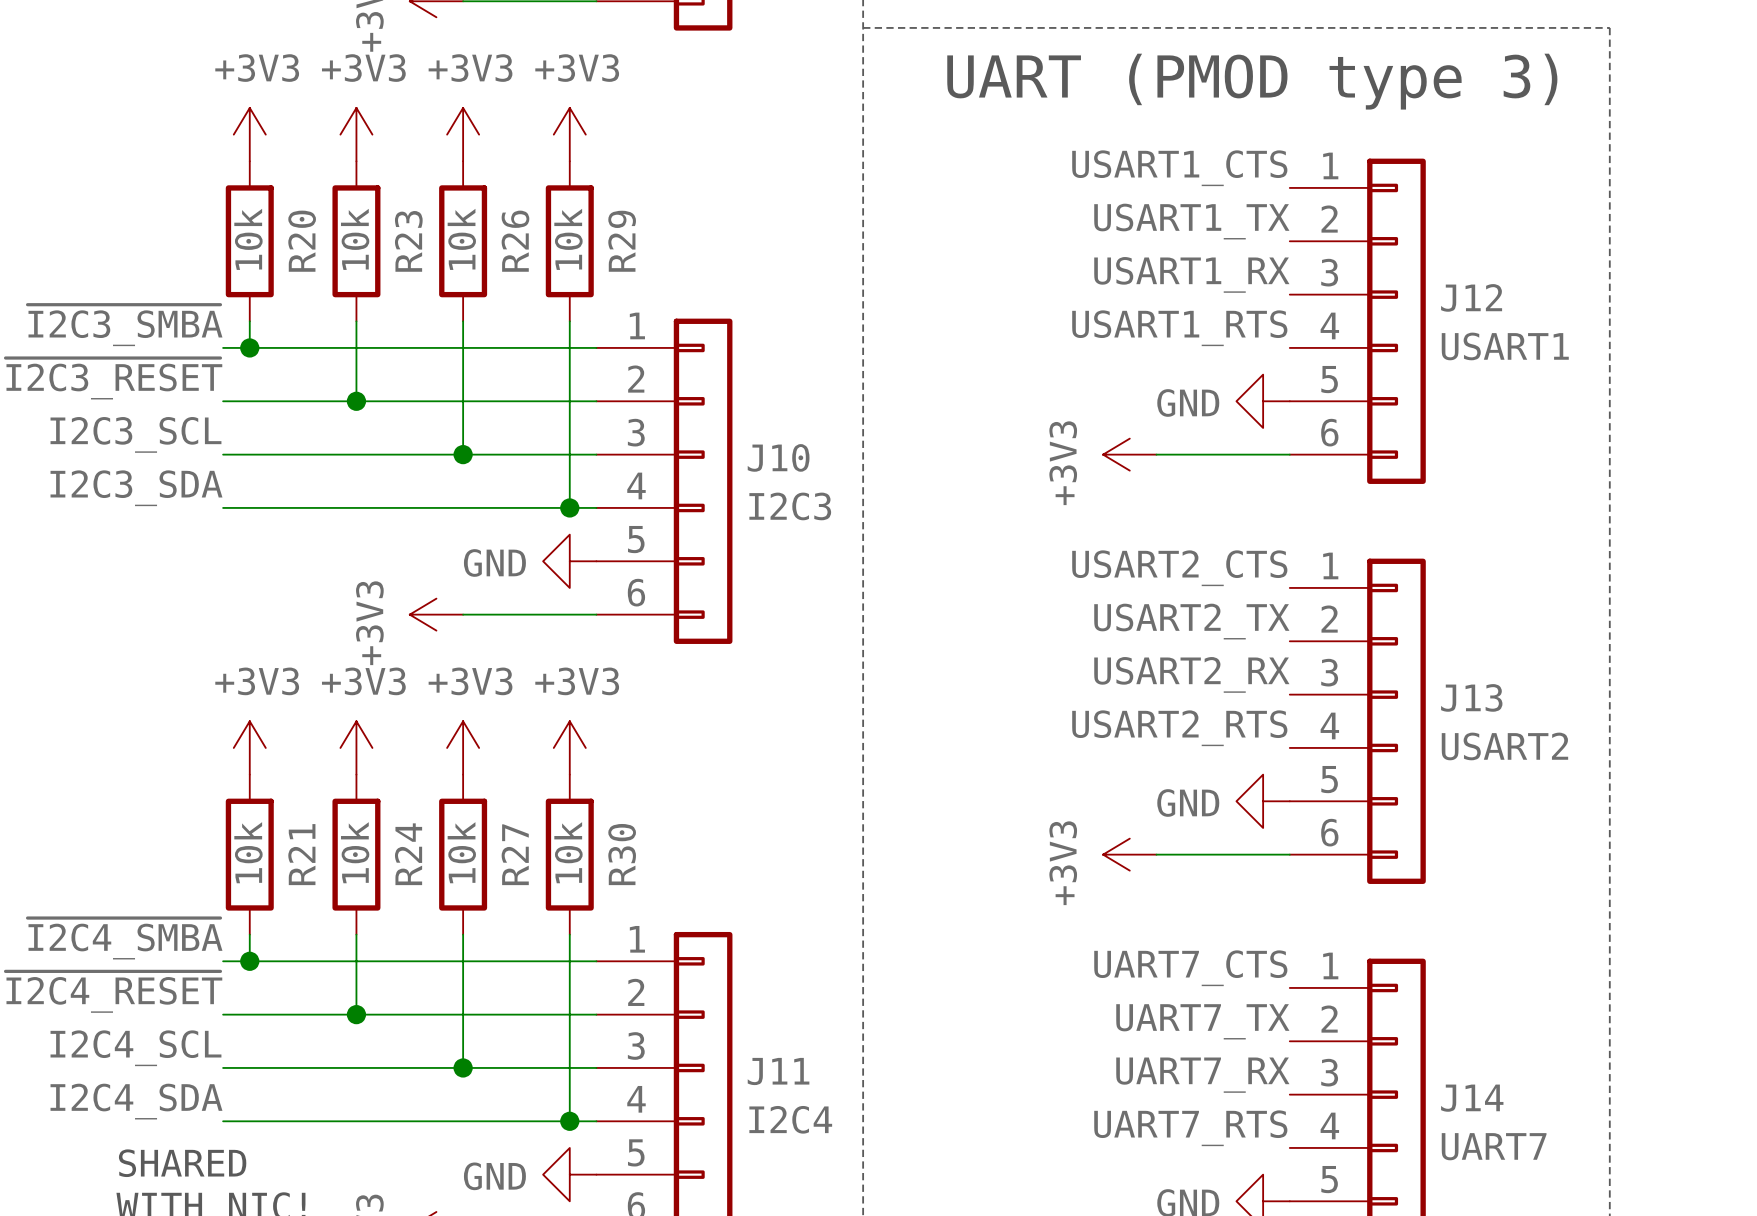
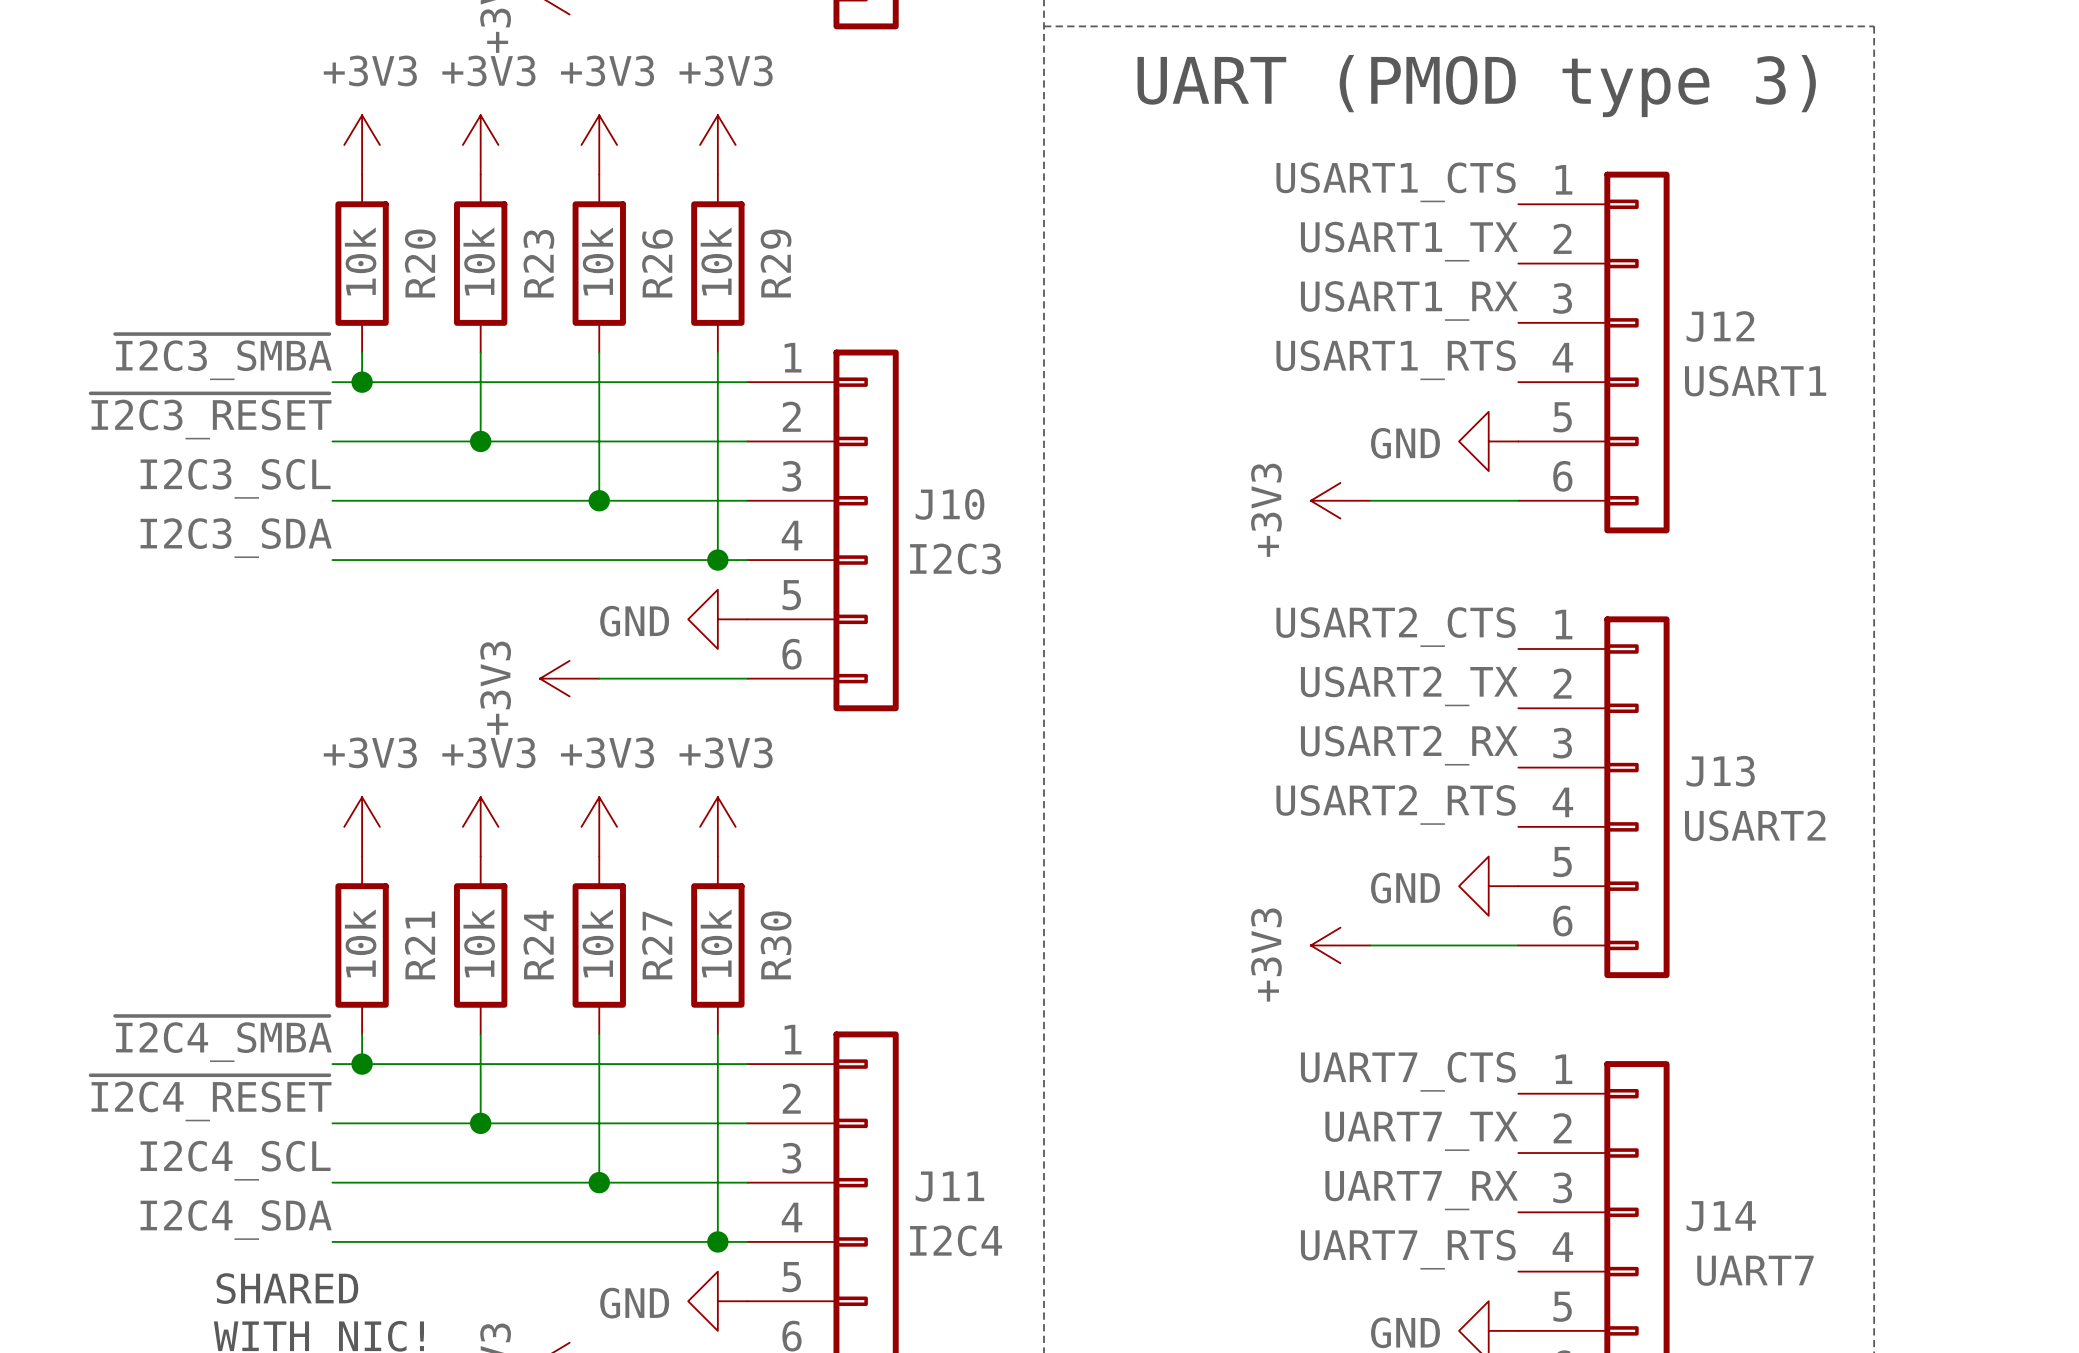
J12 text: none -> USART1 (1755, 381)
J12 value: USART1 (1505, 346) -> none
J10 text: none -> I2C3 (955, 558)
J10 value: I2C3 (790, 506) -> none
J13 text: none -> USART2 (1755, 825)
J13 value: USART2 (1504, 746) -> none
J11 value: I2C4 (790, 1119) -> none
J11 text: none -> I2C4 (956, 1240)
J14 value: UART7 (1494, 1146) -> none
J14 text: none -> UART7 (1755, 1270)

